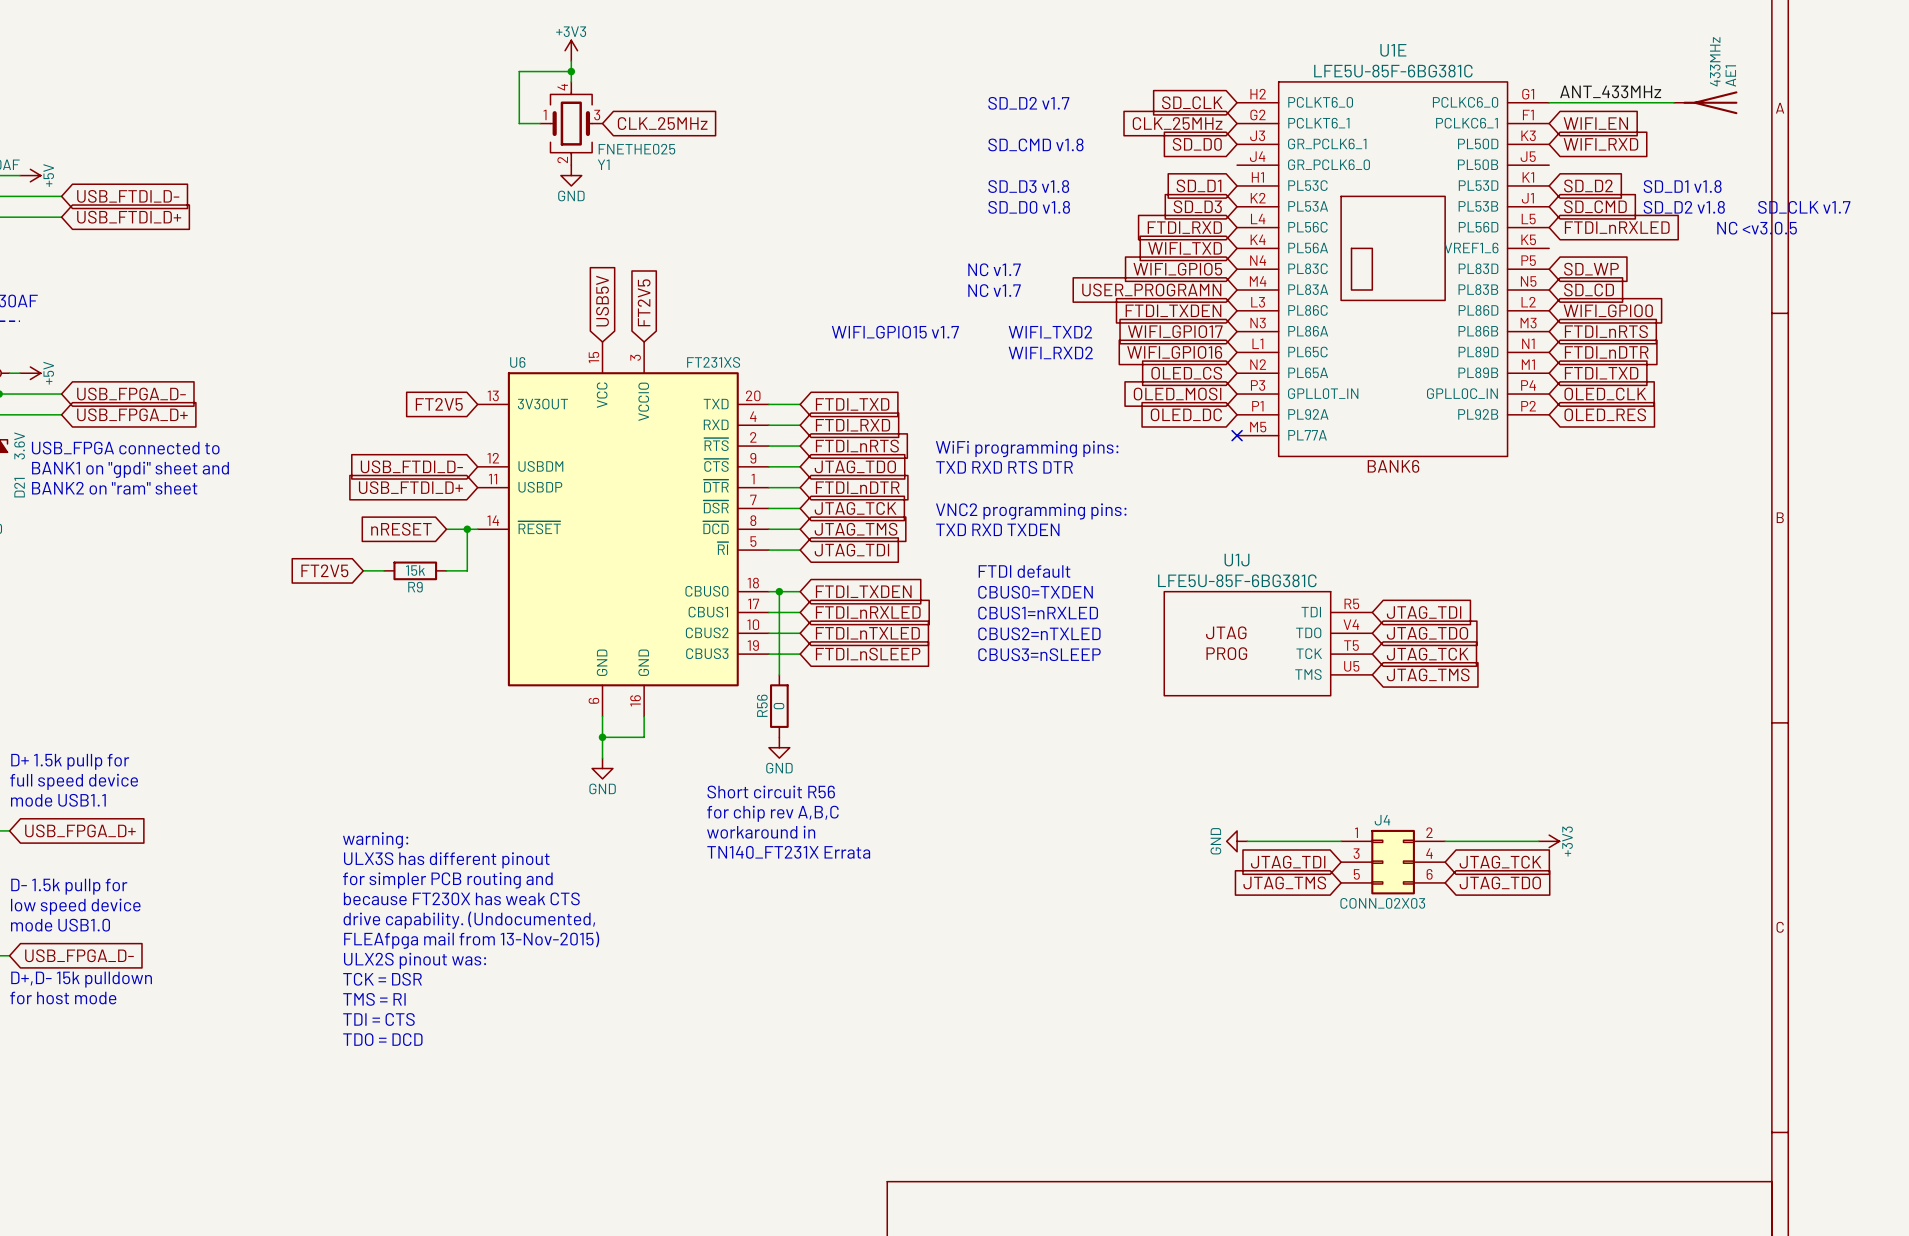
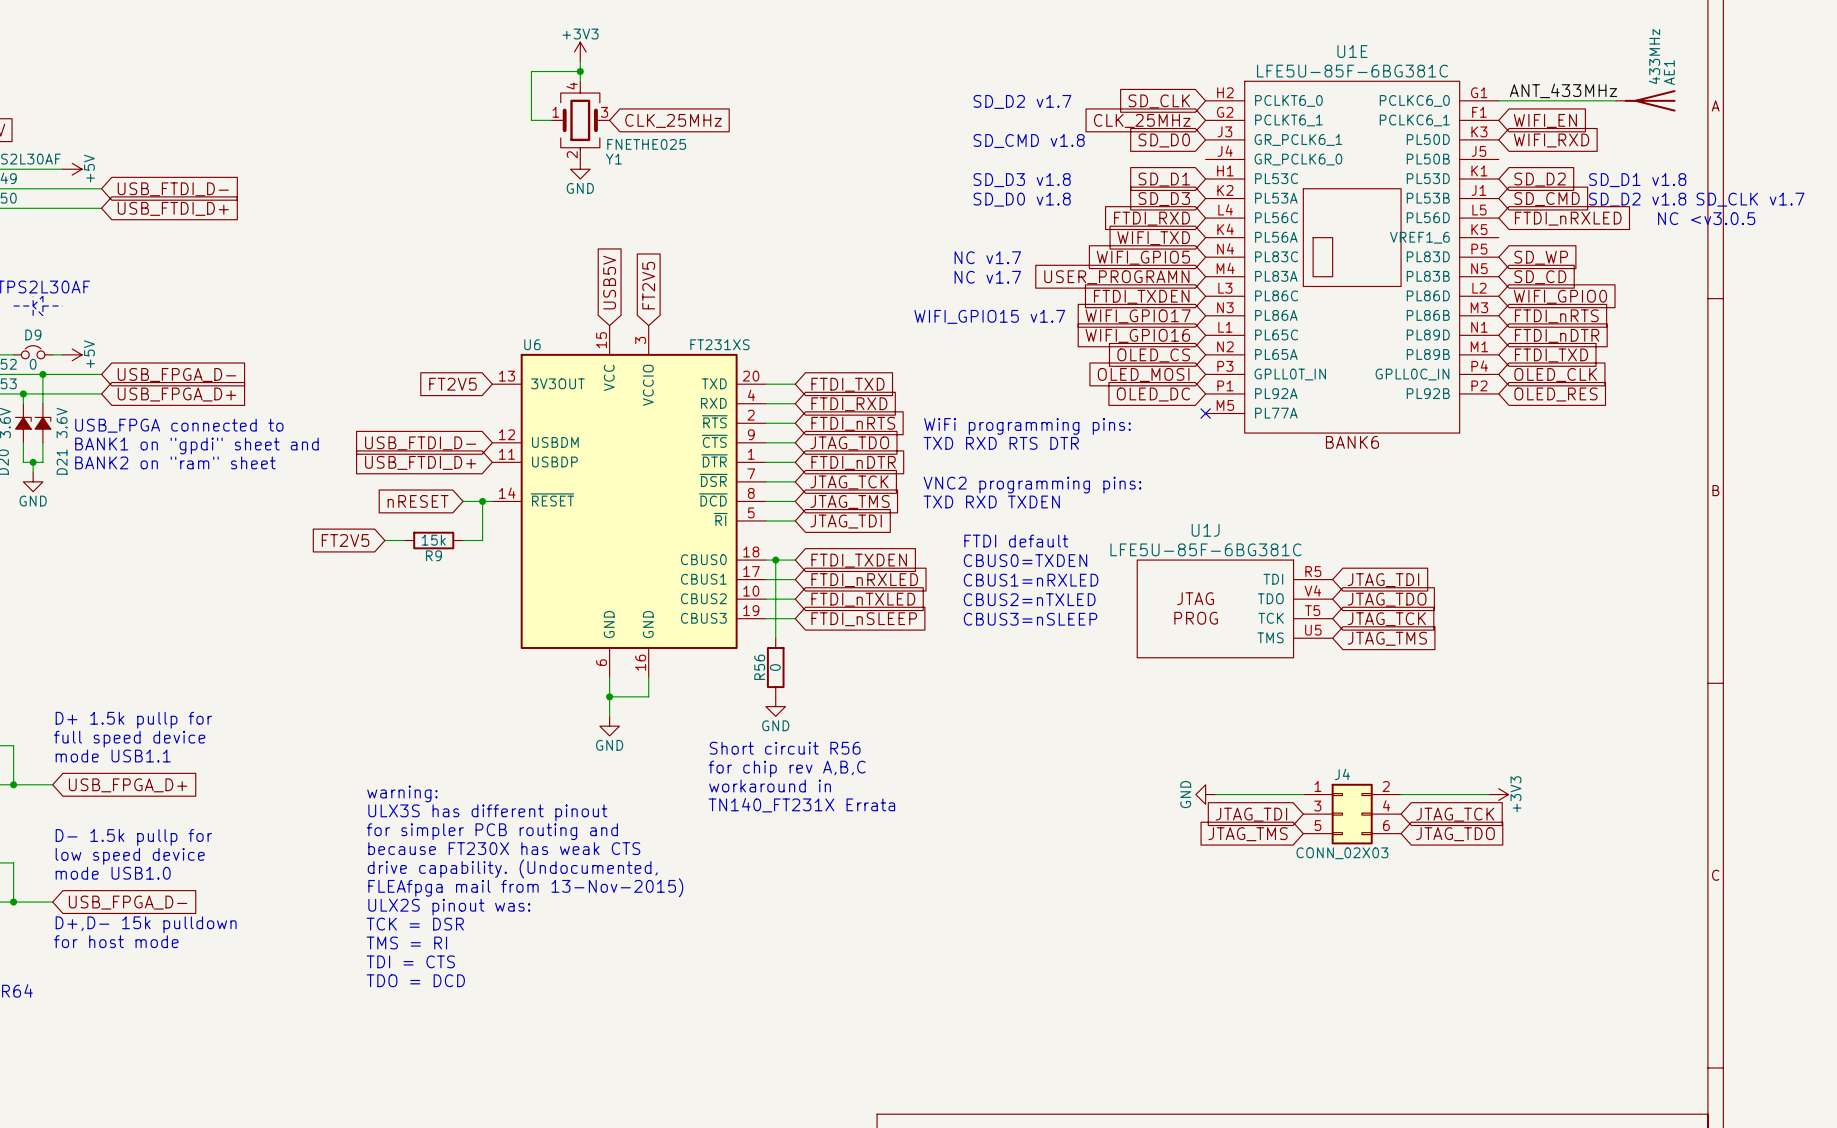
text position: WIFI_GPIO15 v1.7 (895, 332) -> WIFI_GPIO15 v1.7 (989, 316)
text: WIFI_TXD2 (1050, 332) -> none
text: WIFI_RXD2 (1050, 352) -> none

